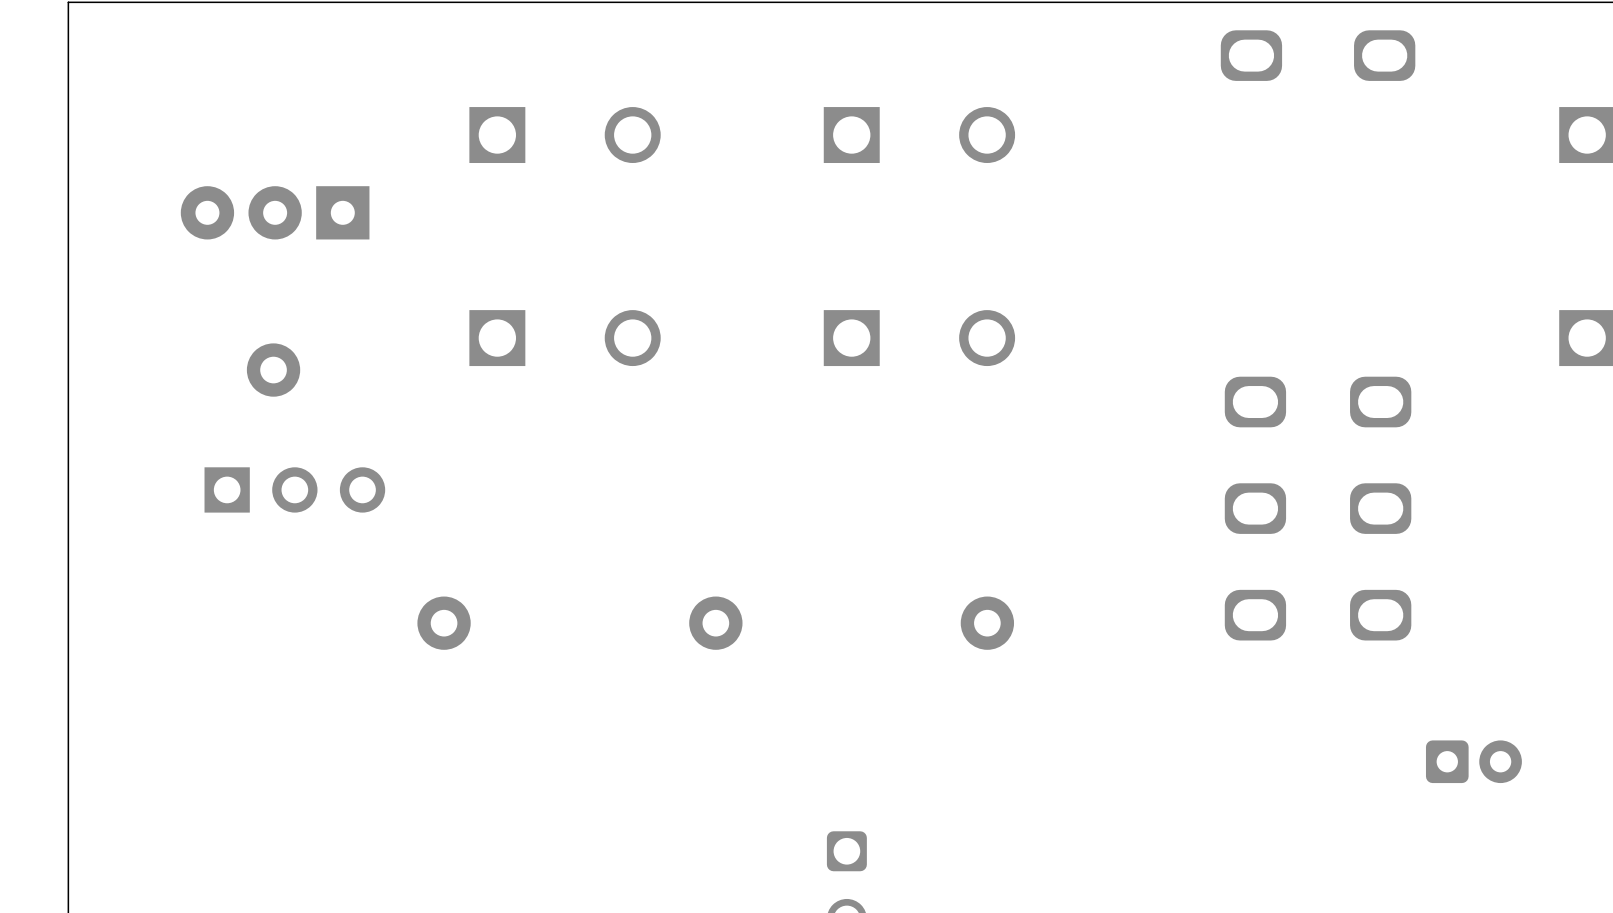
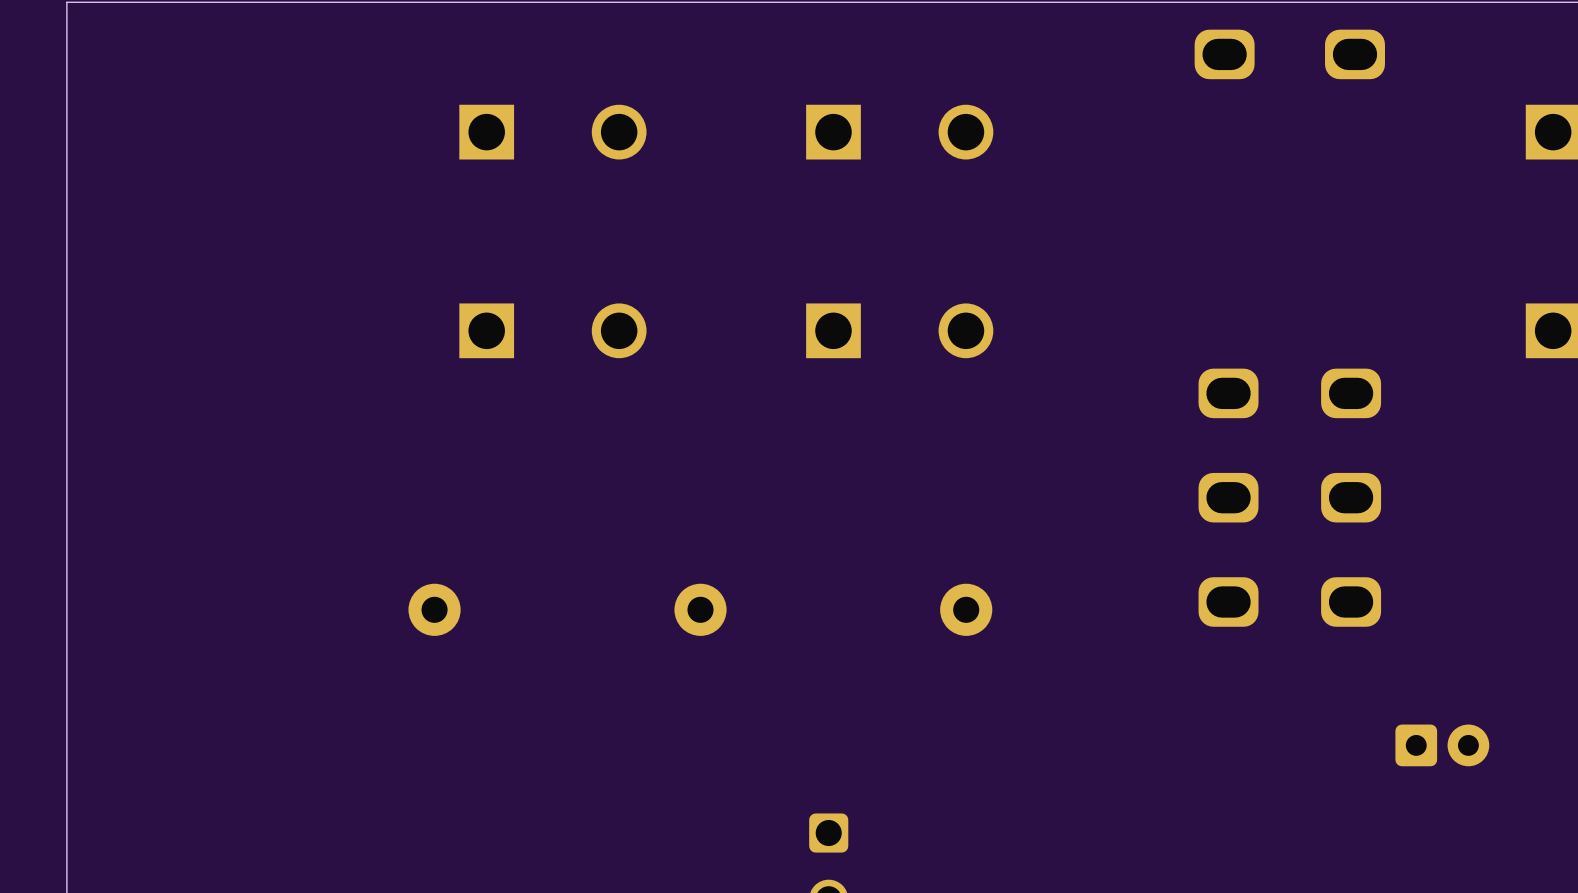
part: (275, 212) -> none
part: (273, 370) -> none
part: (294, 489) -> none

